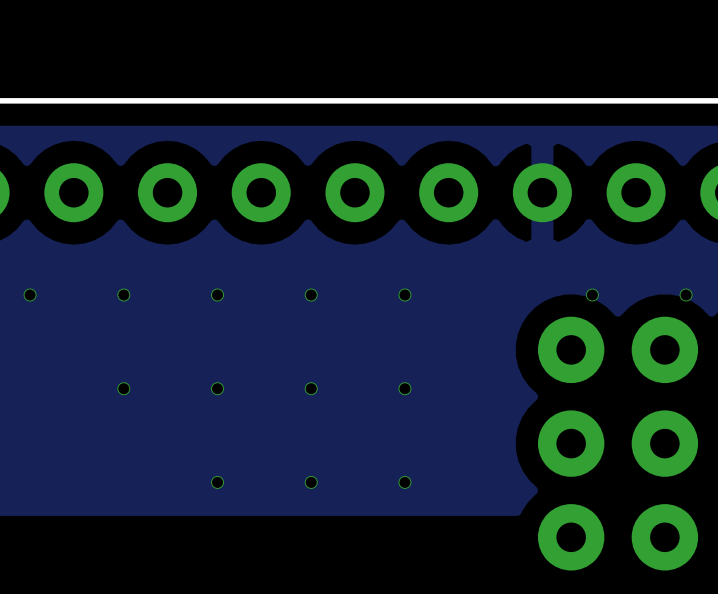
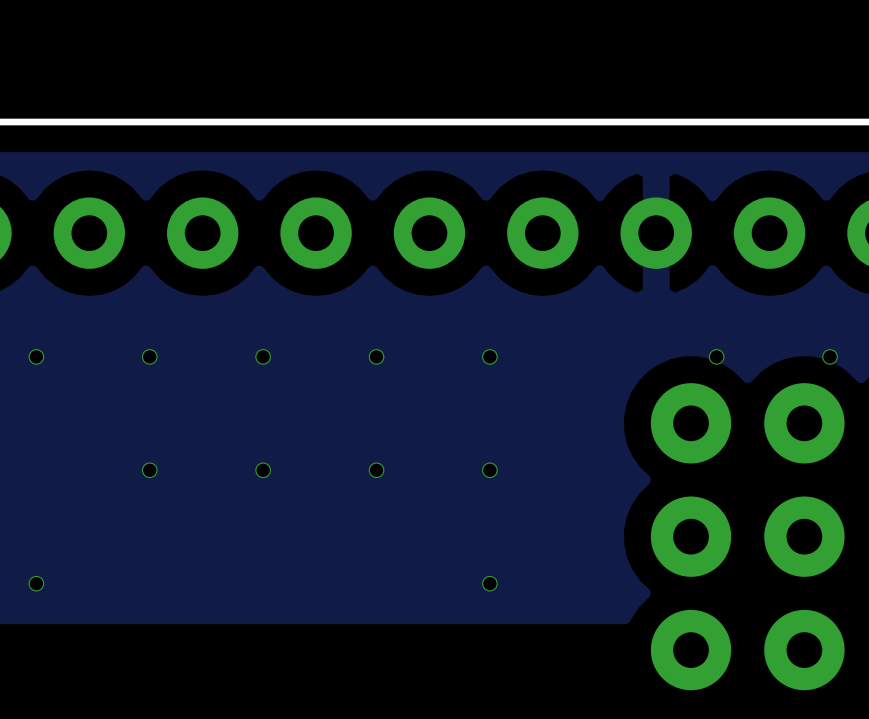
part: none -> (36, 583)
part: (217, 482) -> none
part: (311, 482) -> none

